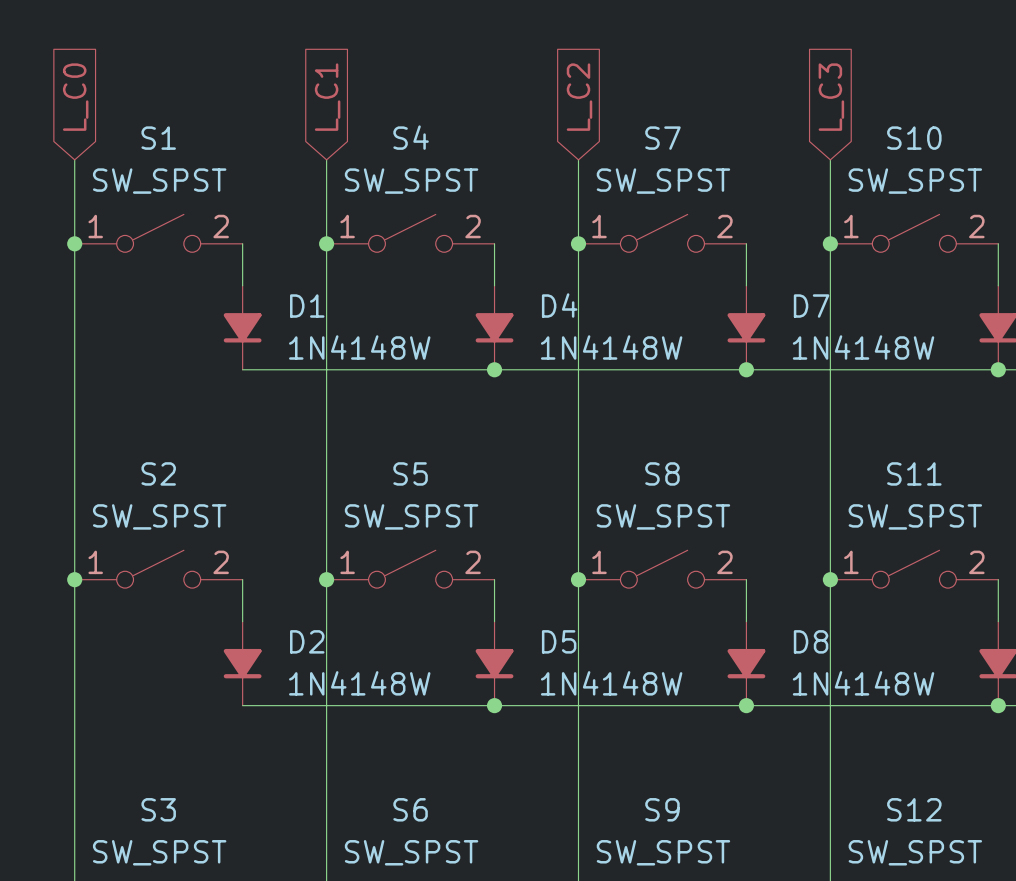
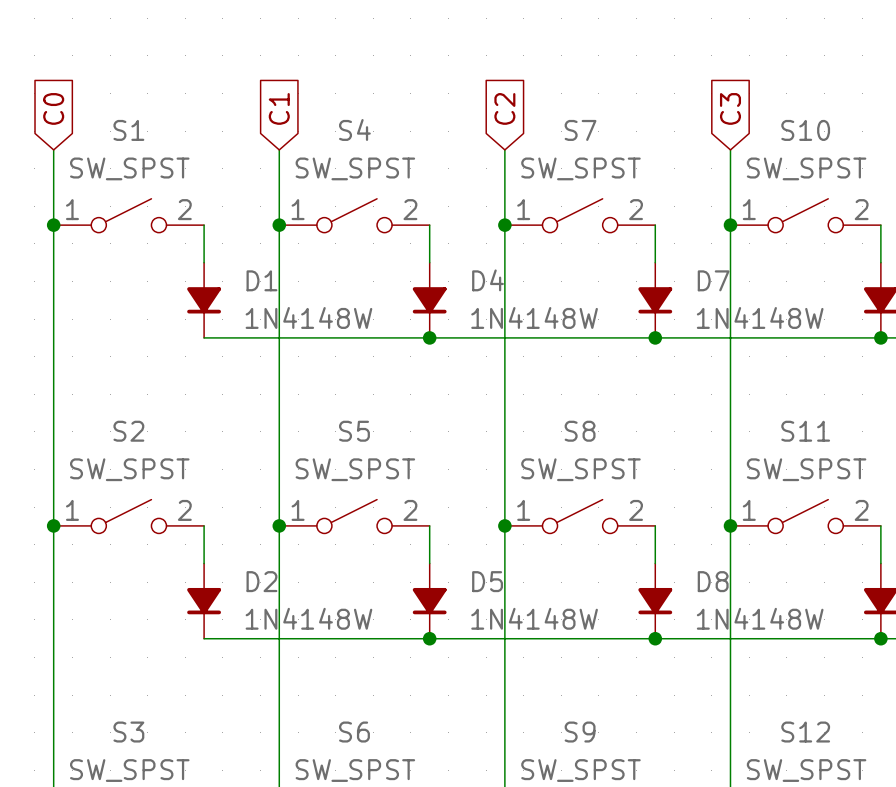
global label: L_C0 (75, 97) -> C0 (53, 108)
global label: L_C1 (327, 97) -> C1 (279, 108)
global label: L_C2 (579, 97) -> C2 (504, 108)
global label: L_C3 (831, 97) -> C3 (730, 108)

